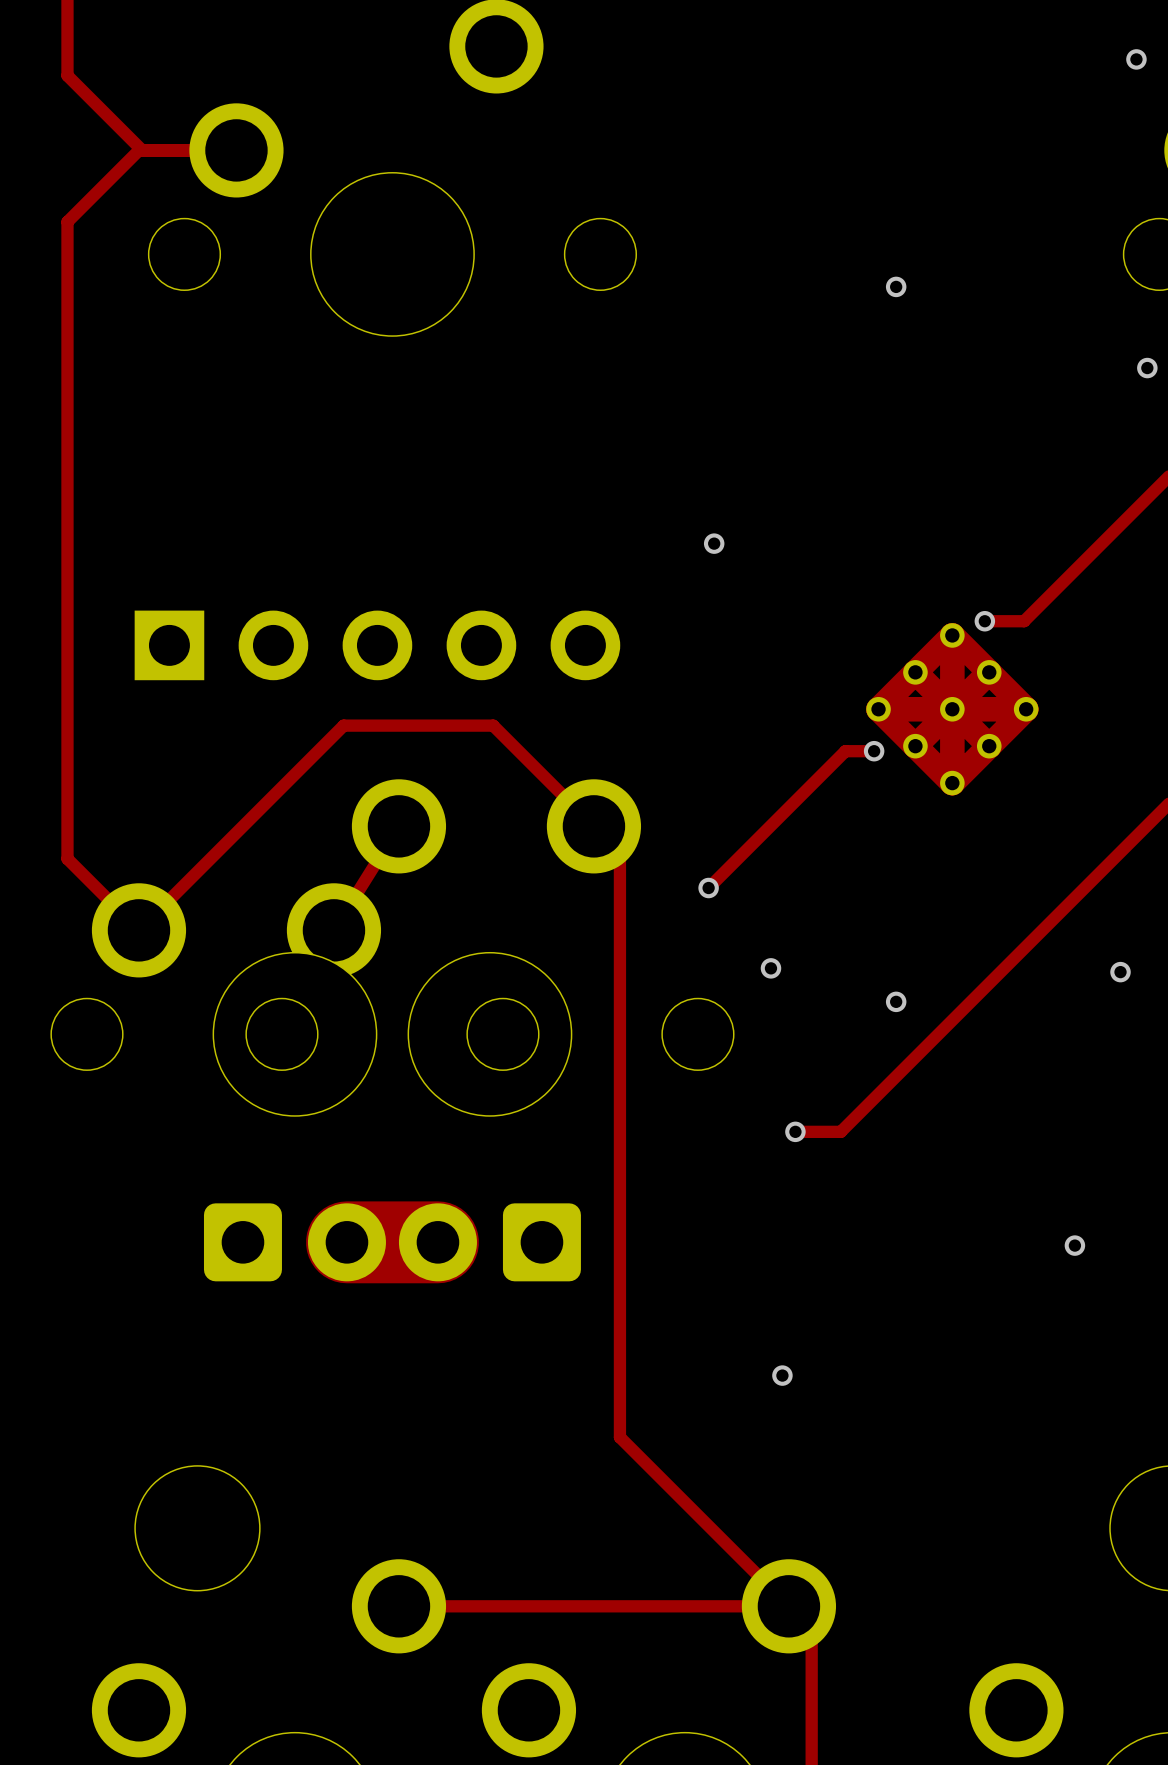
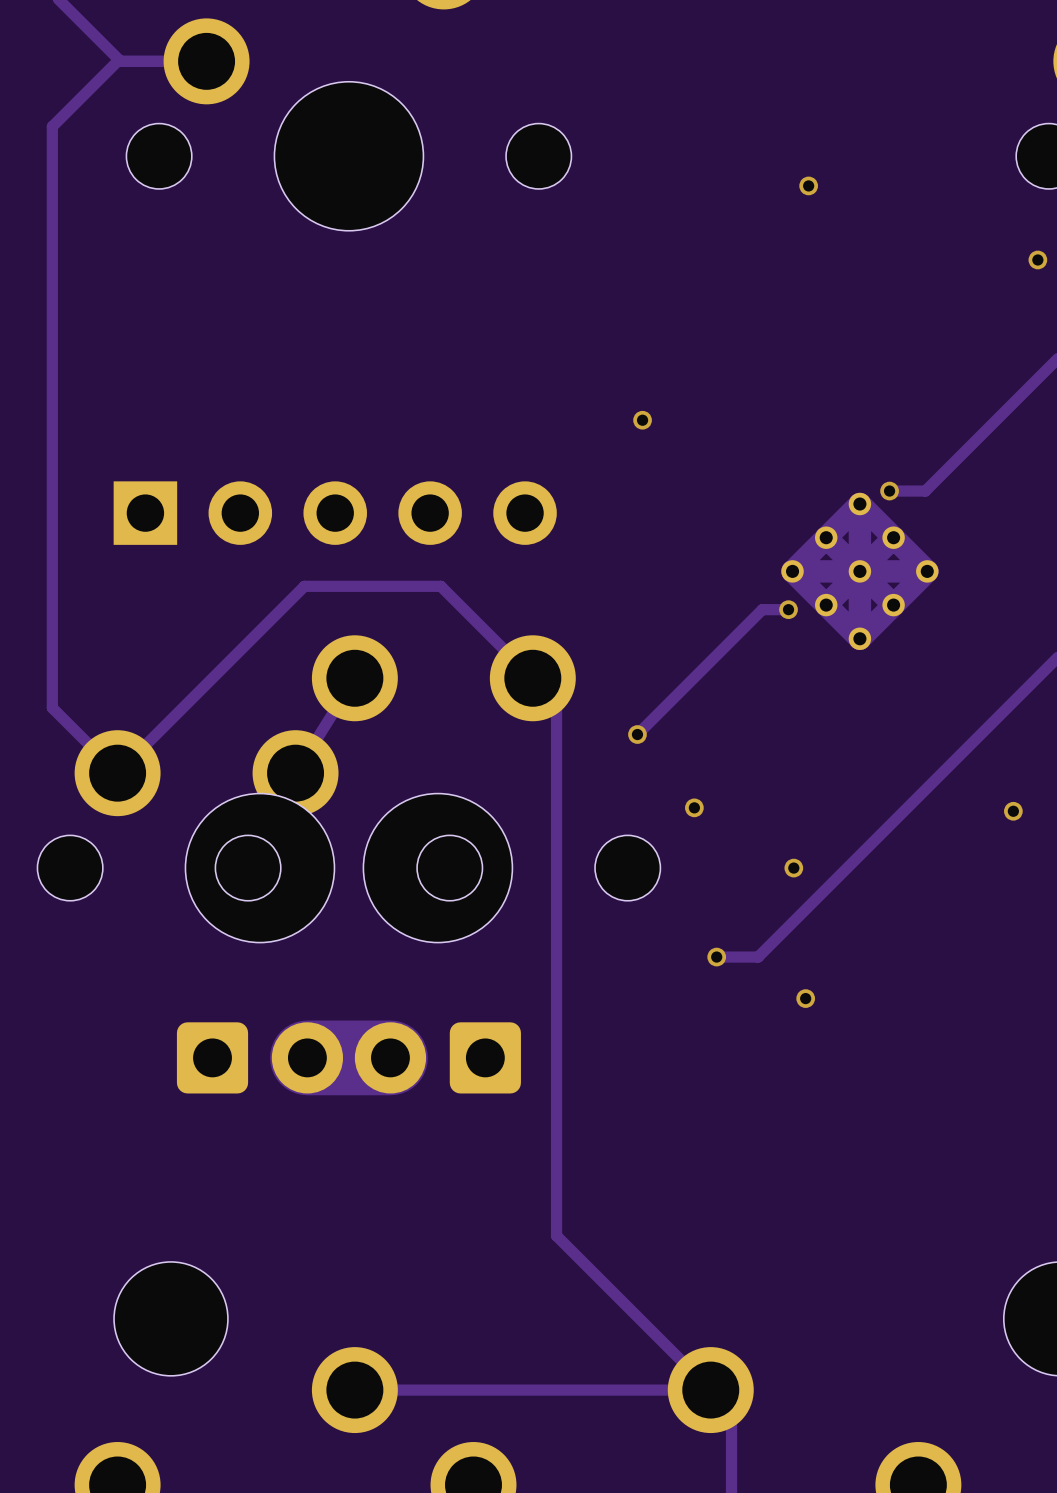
via position: (896, 1001) -> (793, 868)
via: none -> (805, 998)
via: (1074, 1245) -> none
via: (782, 1375) -> none

